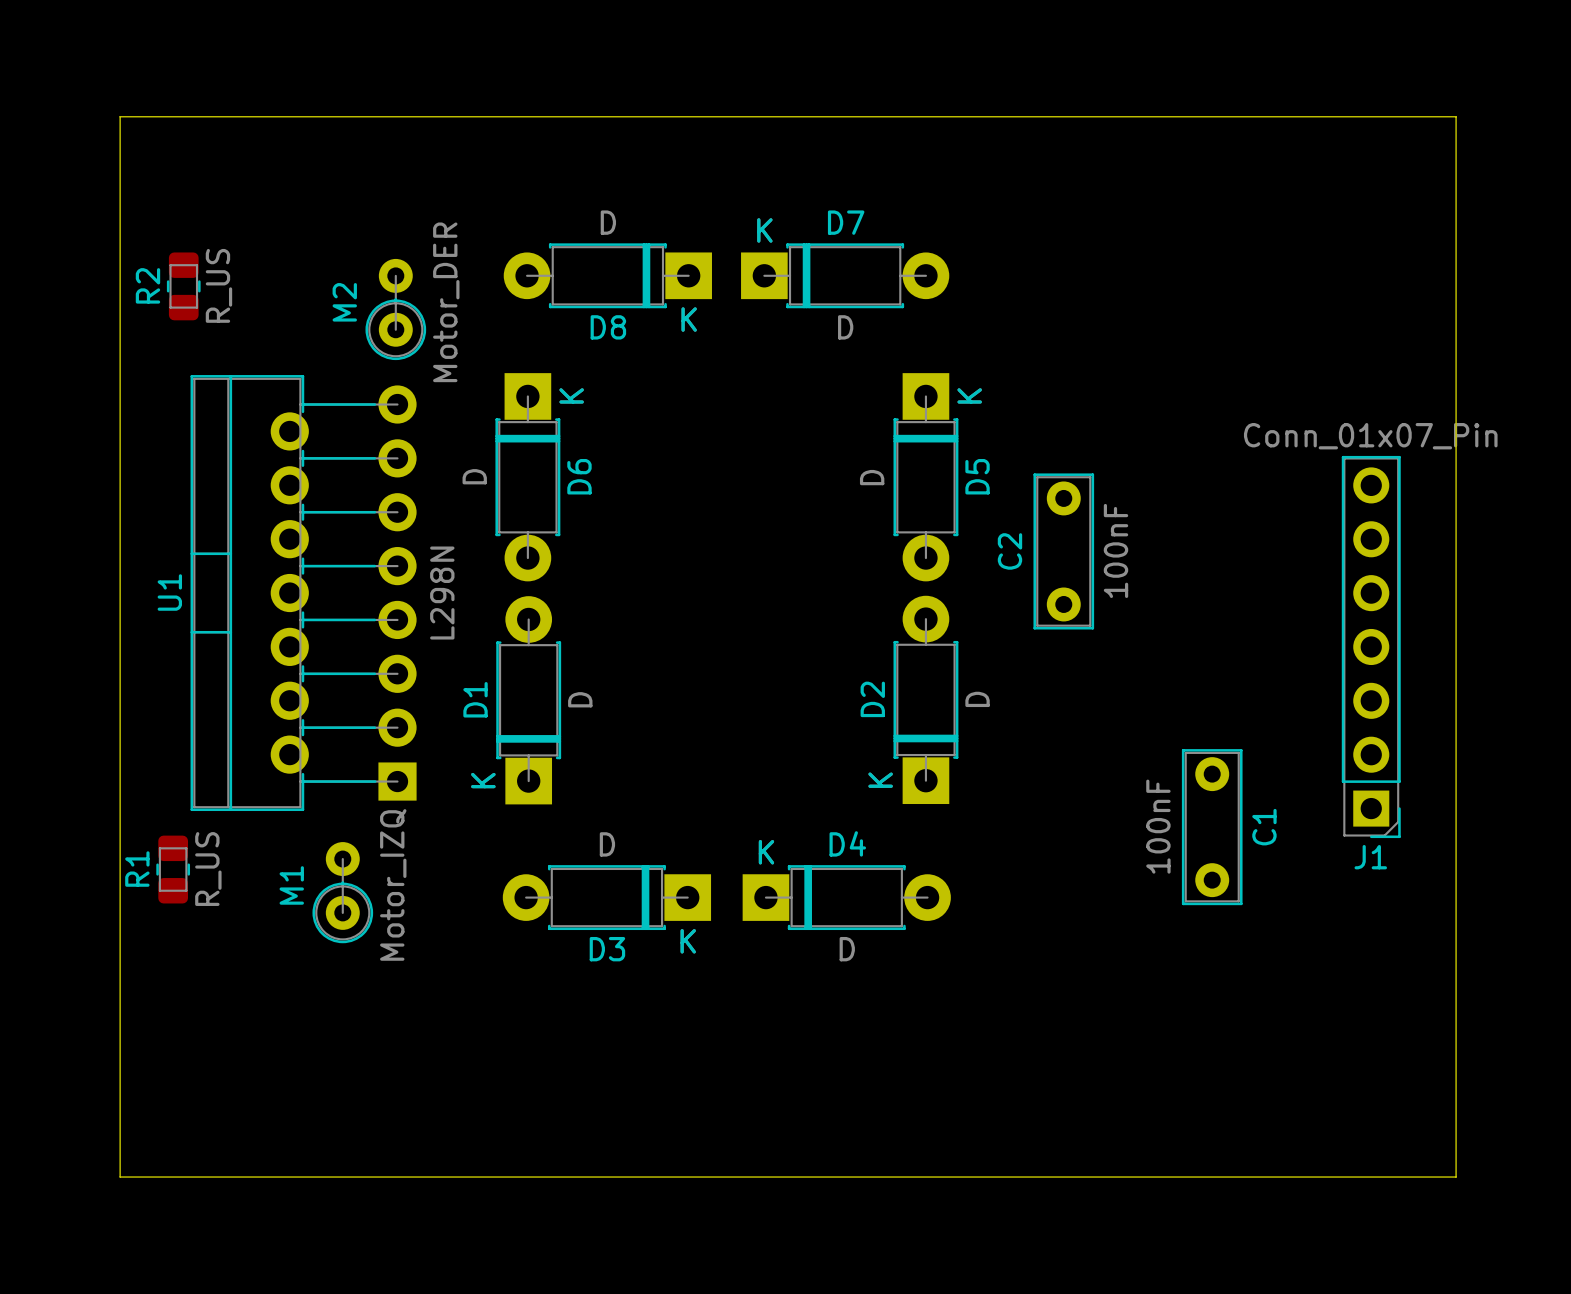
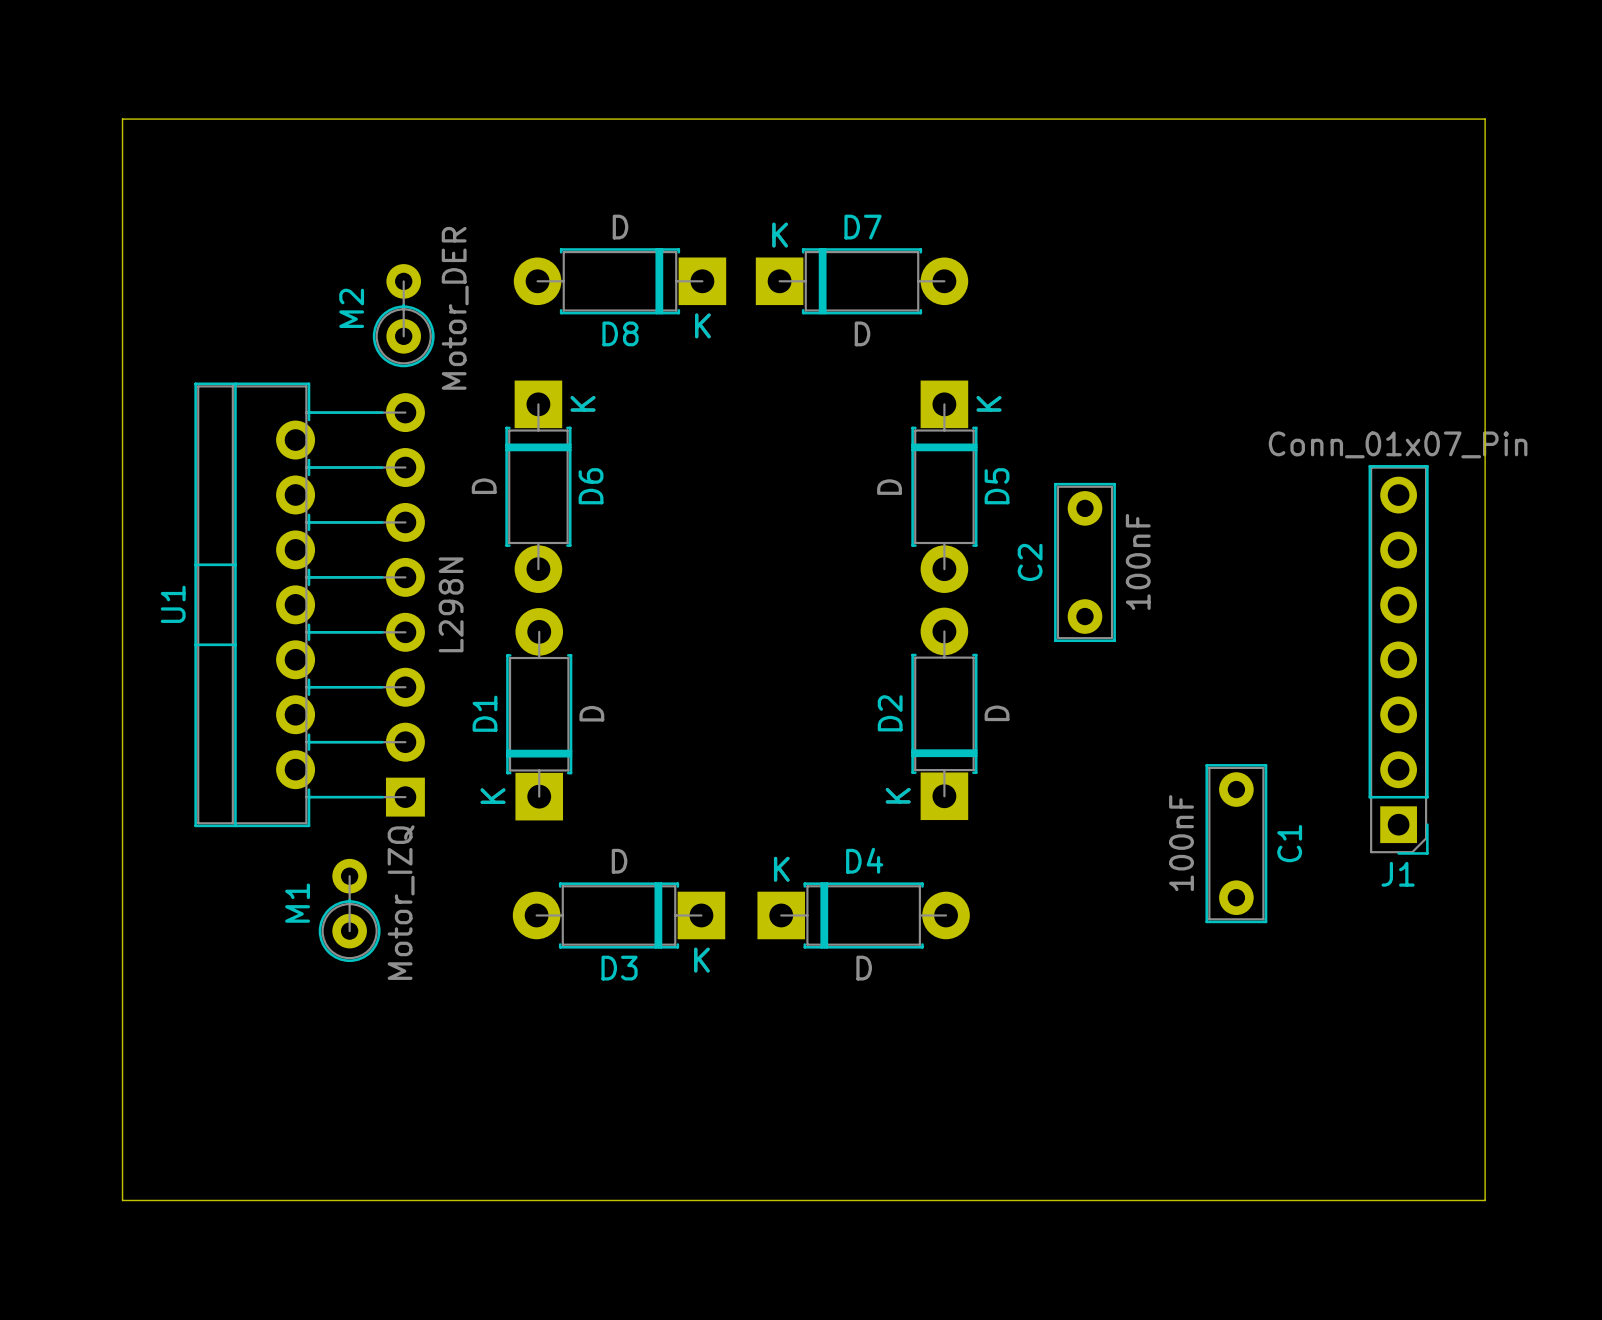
R2: R_US (183, 286) -> none
R1: R_US (173, 869) -> none

